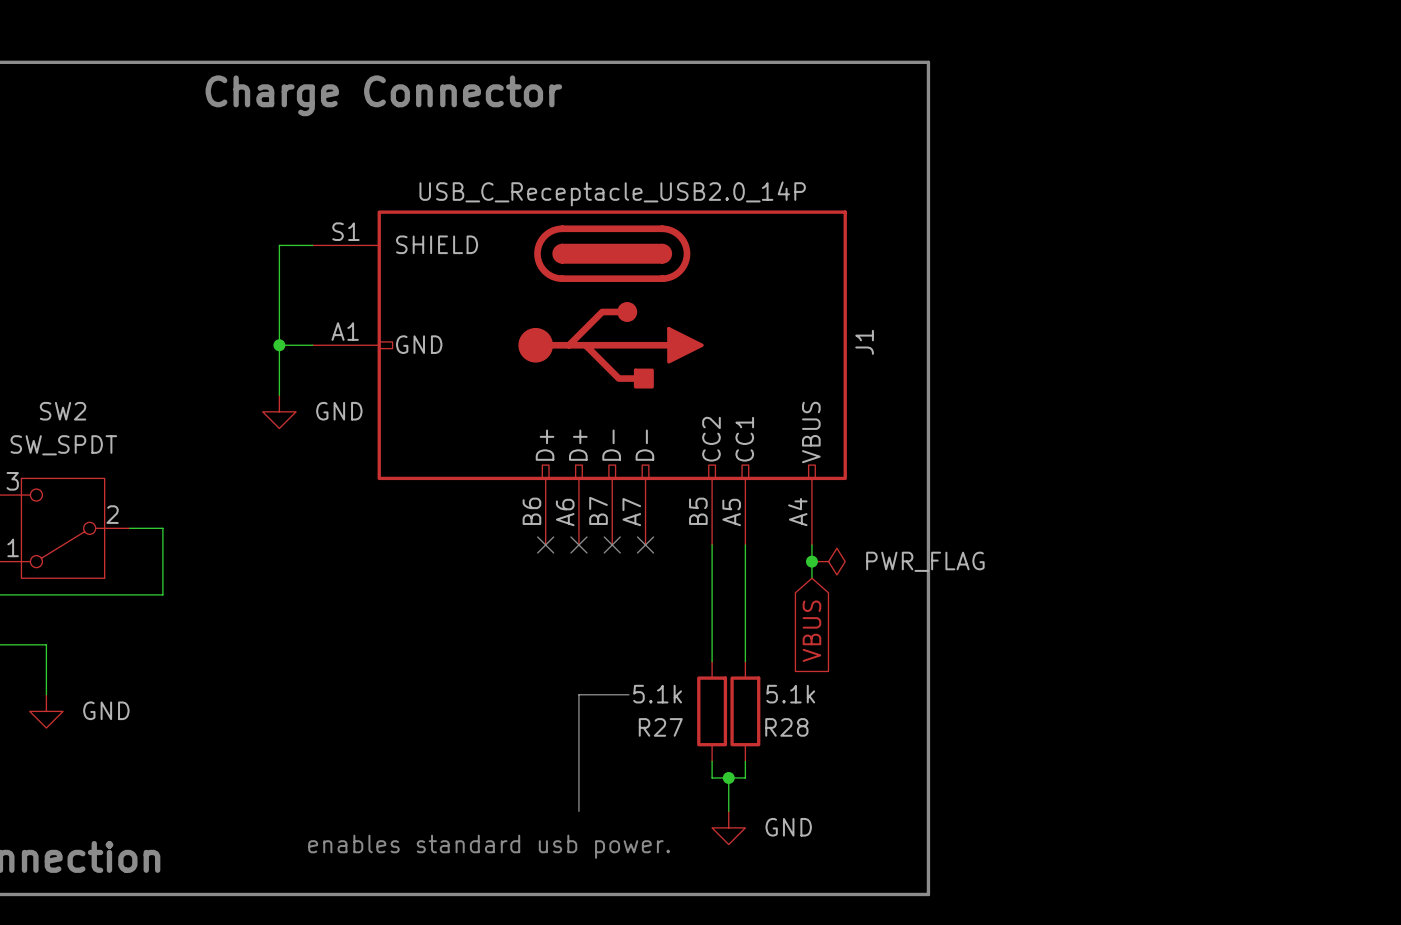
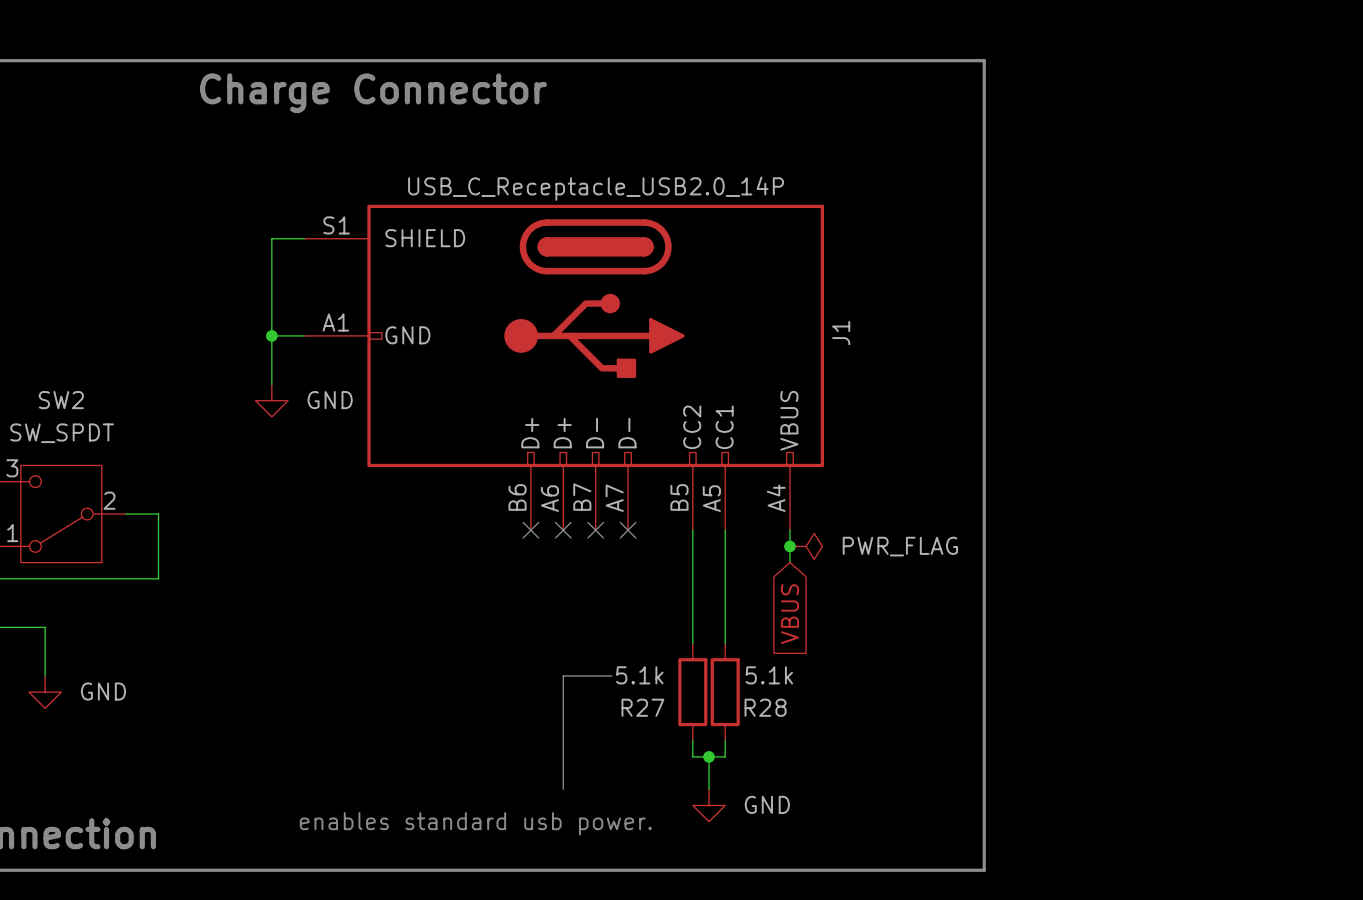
line: (928, 62) (928, 894) -> (903, 60) (984, 60) (984, 870) (903, 870)

